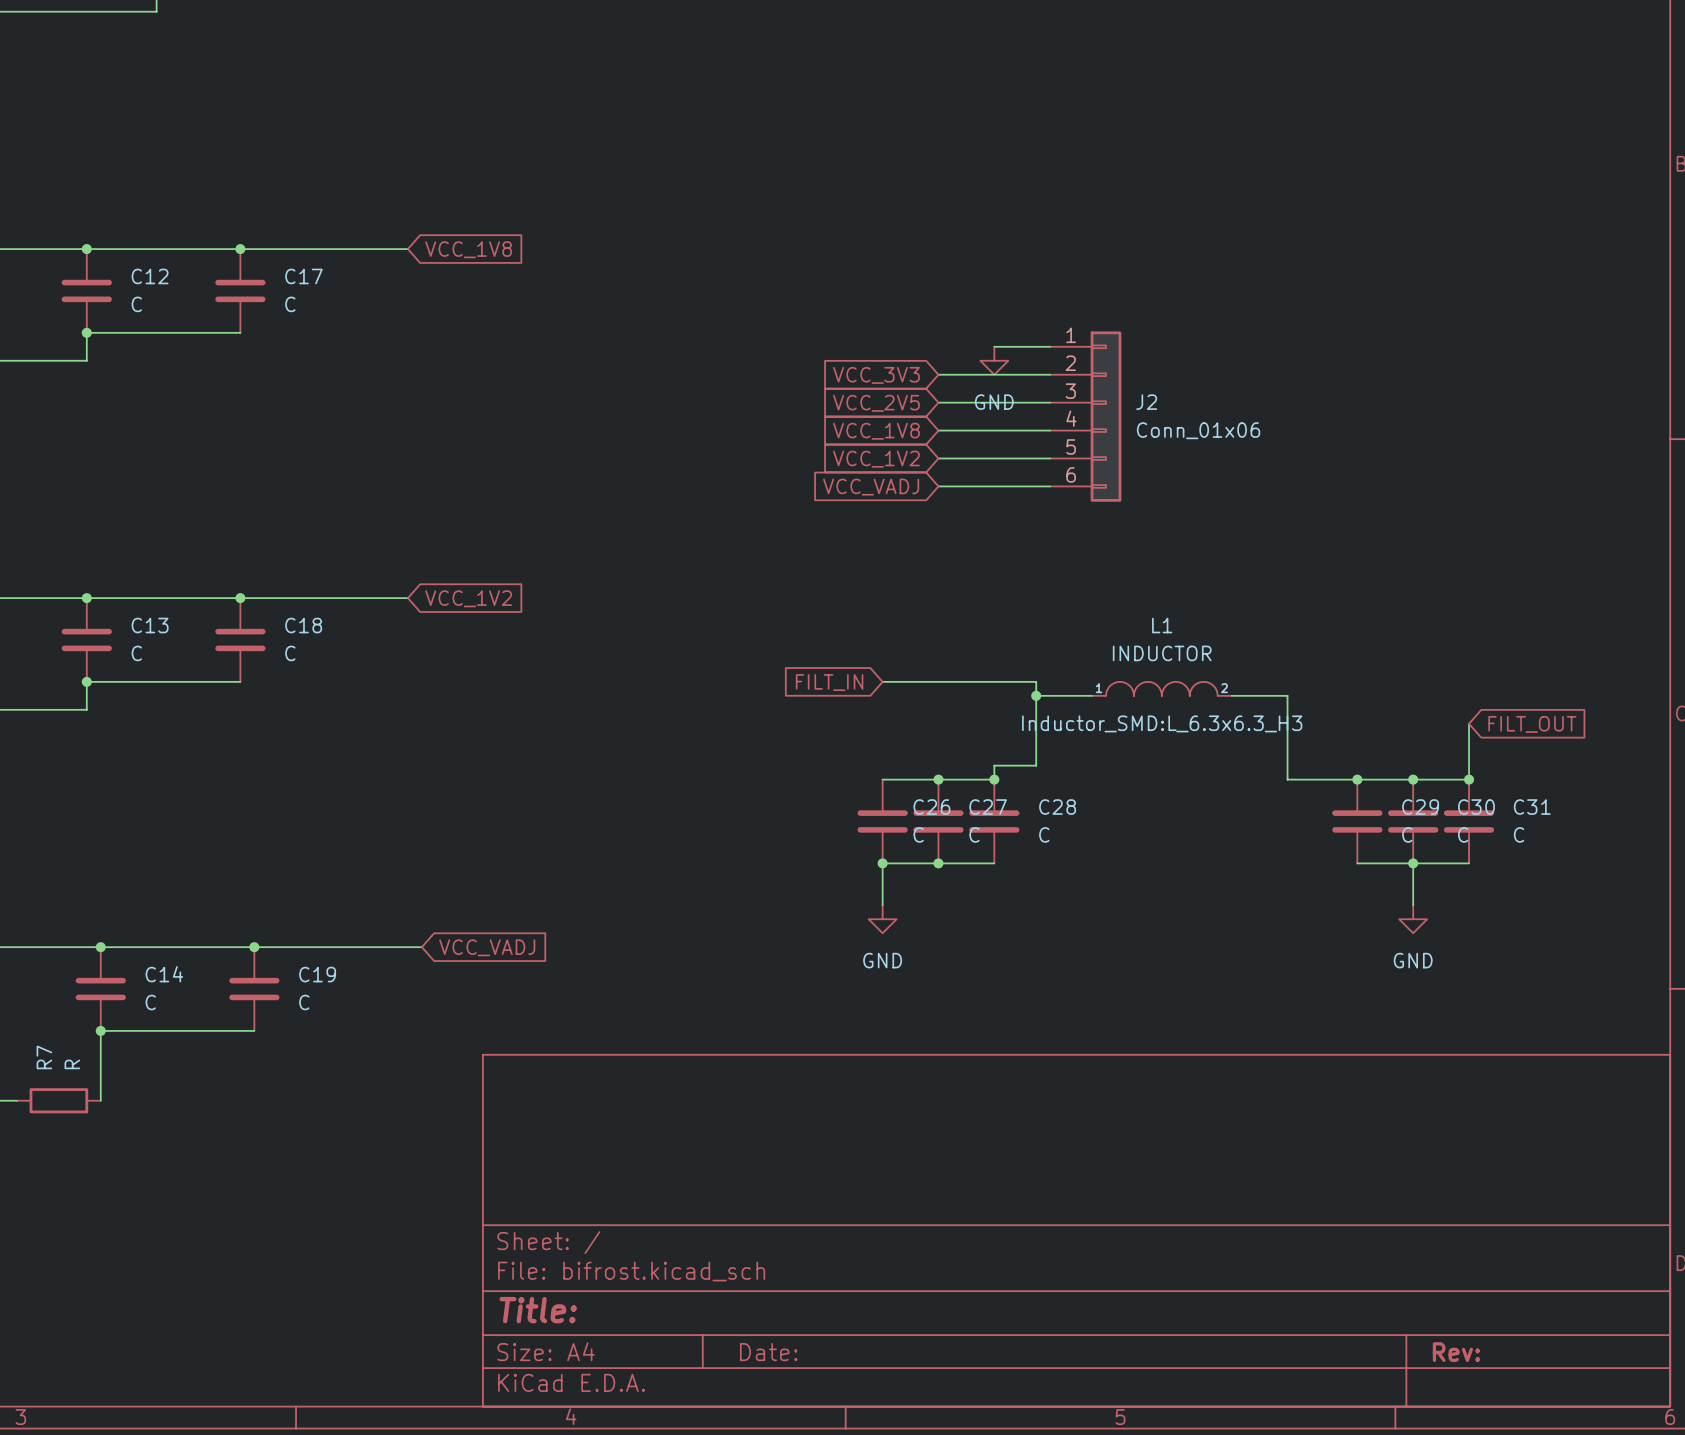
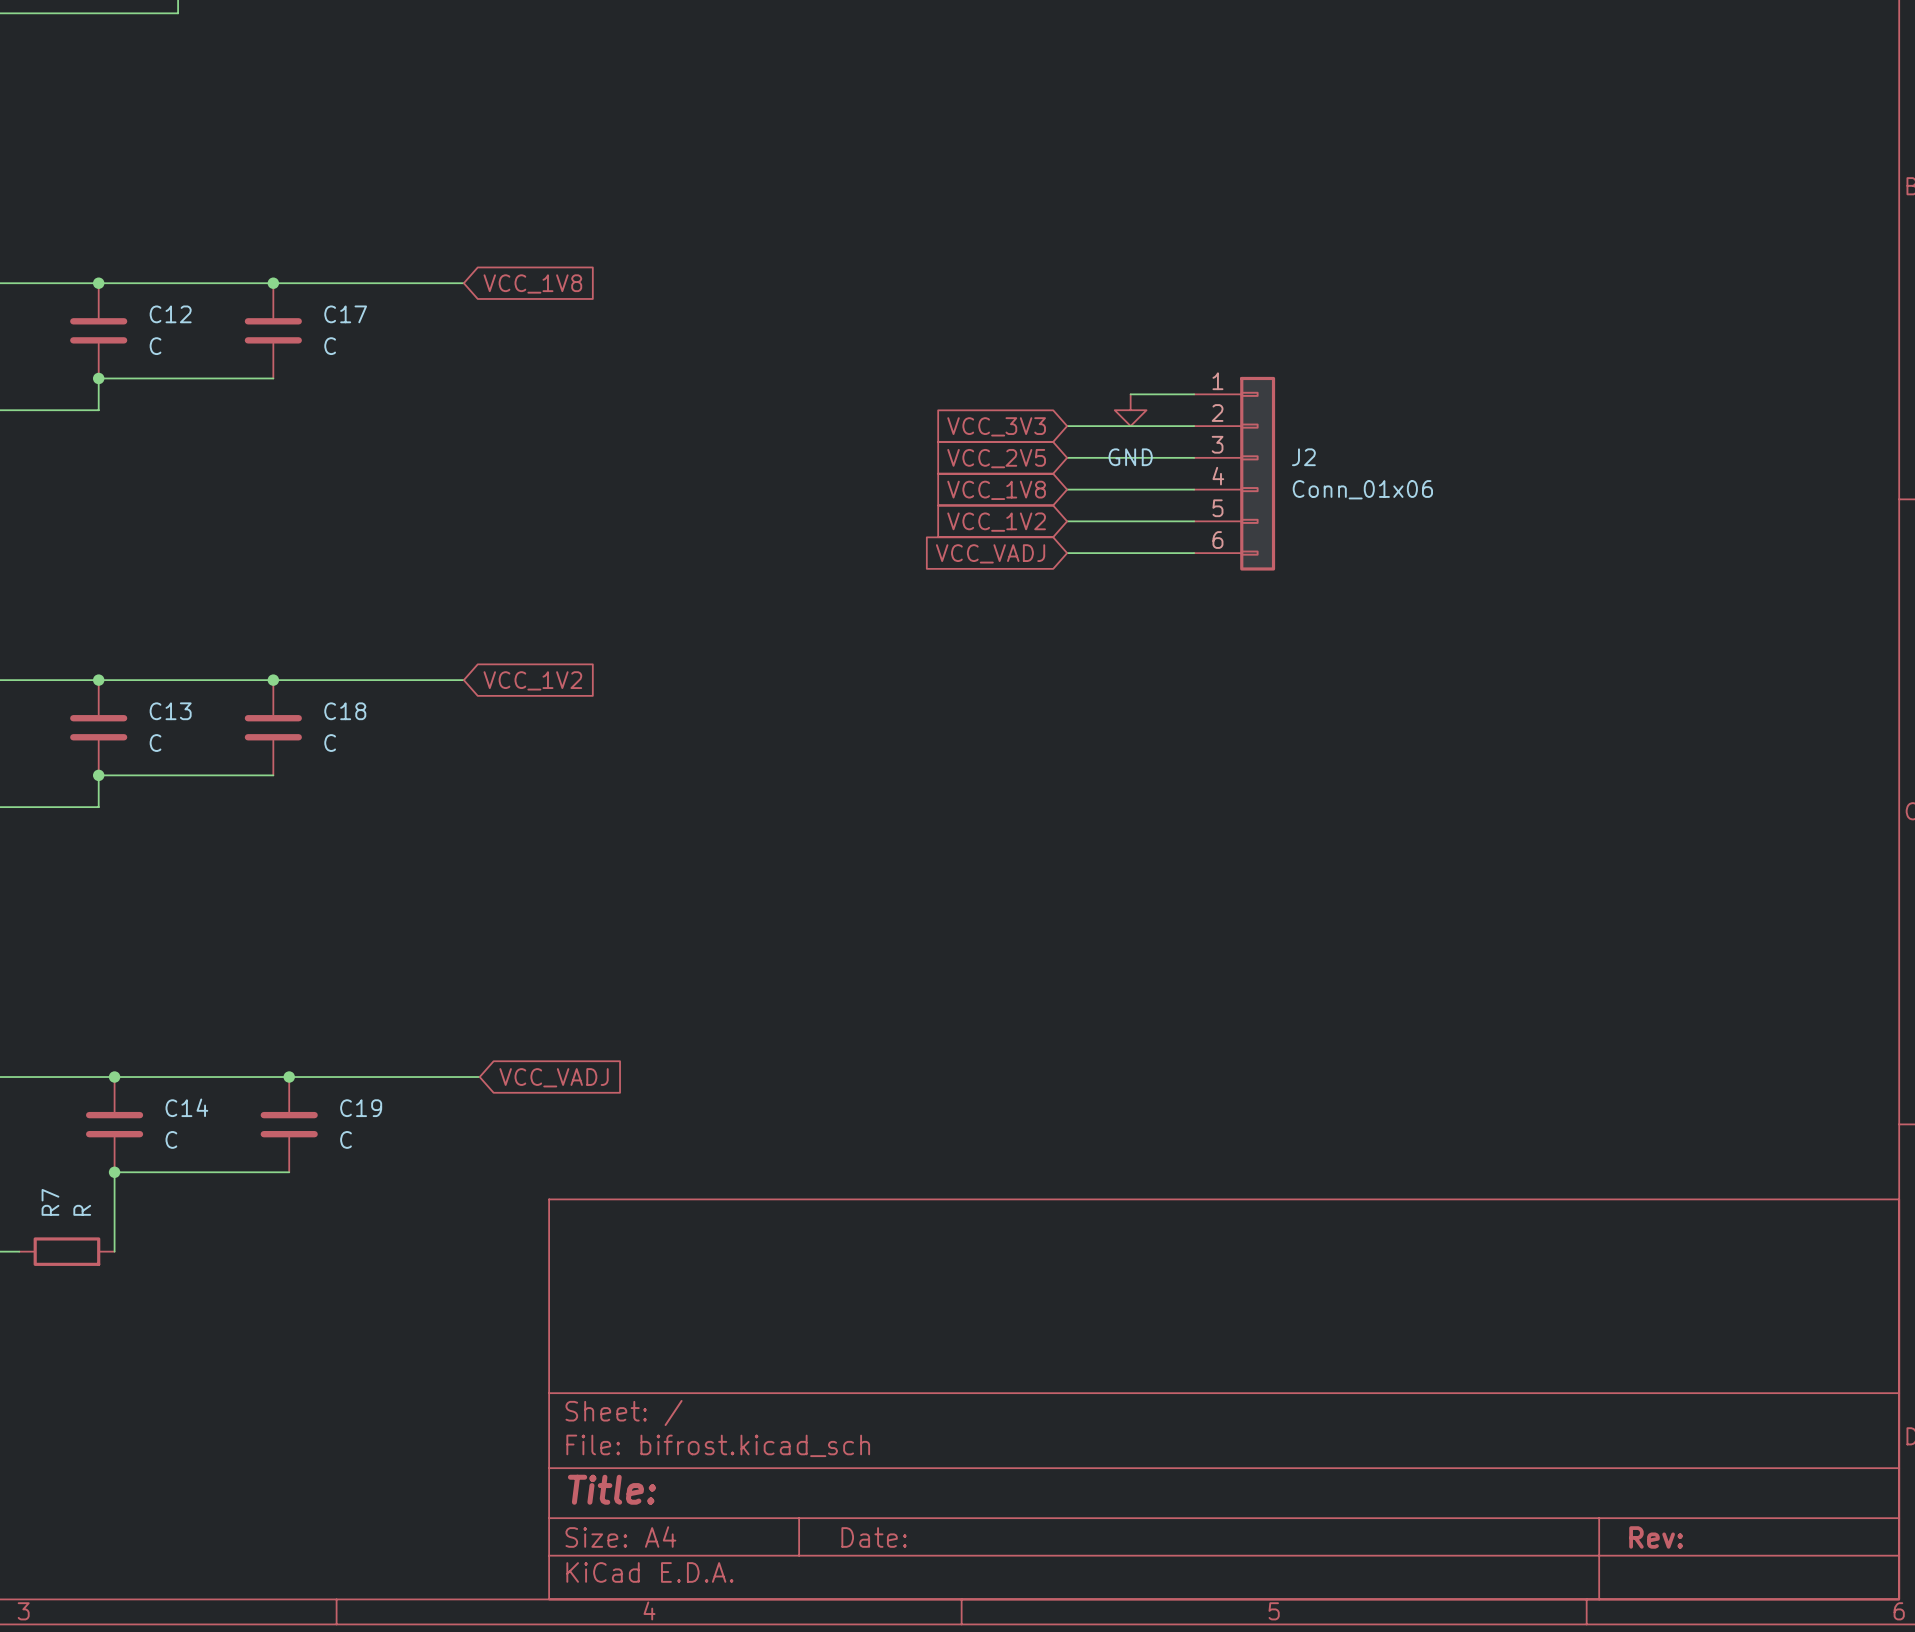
wire: (882, 681) (1036, 681) (1036, 765) (994, 765) (994, 779) (882, 779) -> none
global label: FILT_IN (829, 682) -> none
L1: INDUCTOR (1161, 688) -> none
wire: (1036, 695) (1092, 695) -> none
junction: (1036, 695) -> none
wire: (1231, 695) (1287, 695) (1287, 779) (1469, 779) (1469, 723) -> none
global label: FILT_OUT (1532, 724) -> none
junction: (938, 779) -> none
junction: (994, 779) -> none
junction: (1357, 779) -> none
junction: (1413, 779) -> none
junction: (1469, 779) -> none
C26: C (882, 821) -> none
C27: C (938, 821) -> none
C28: C (994, 821) -> none
C29: C (1357, 821) -> none
C30: C (1413, 821) -> none
C31: C (1469, 821) -> none
junction: (882, 863) -> none
junction: (938, 863) -> none
wire: (994, 863) (882, 863) (882, 905) -> none
wire: (1357, 863) (1469, 863) -> none
wire: (1413, 863) (1413, 905) -> none
junction: (1413, 863) -> none
power symbol: GND (882, 919) -> none
power symbol: GND (1413, 919) -> none

